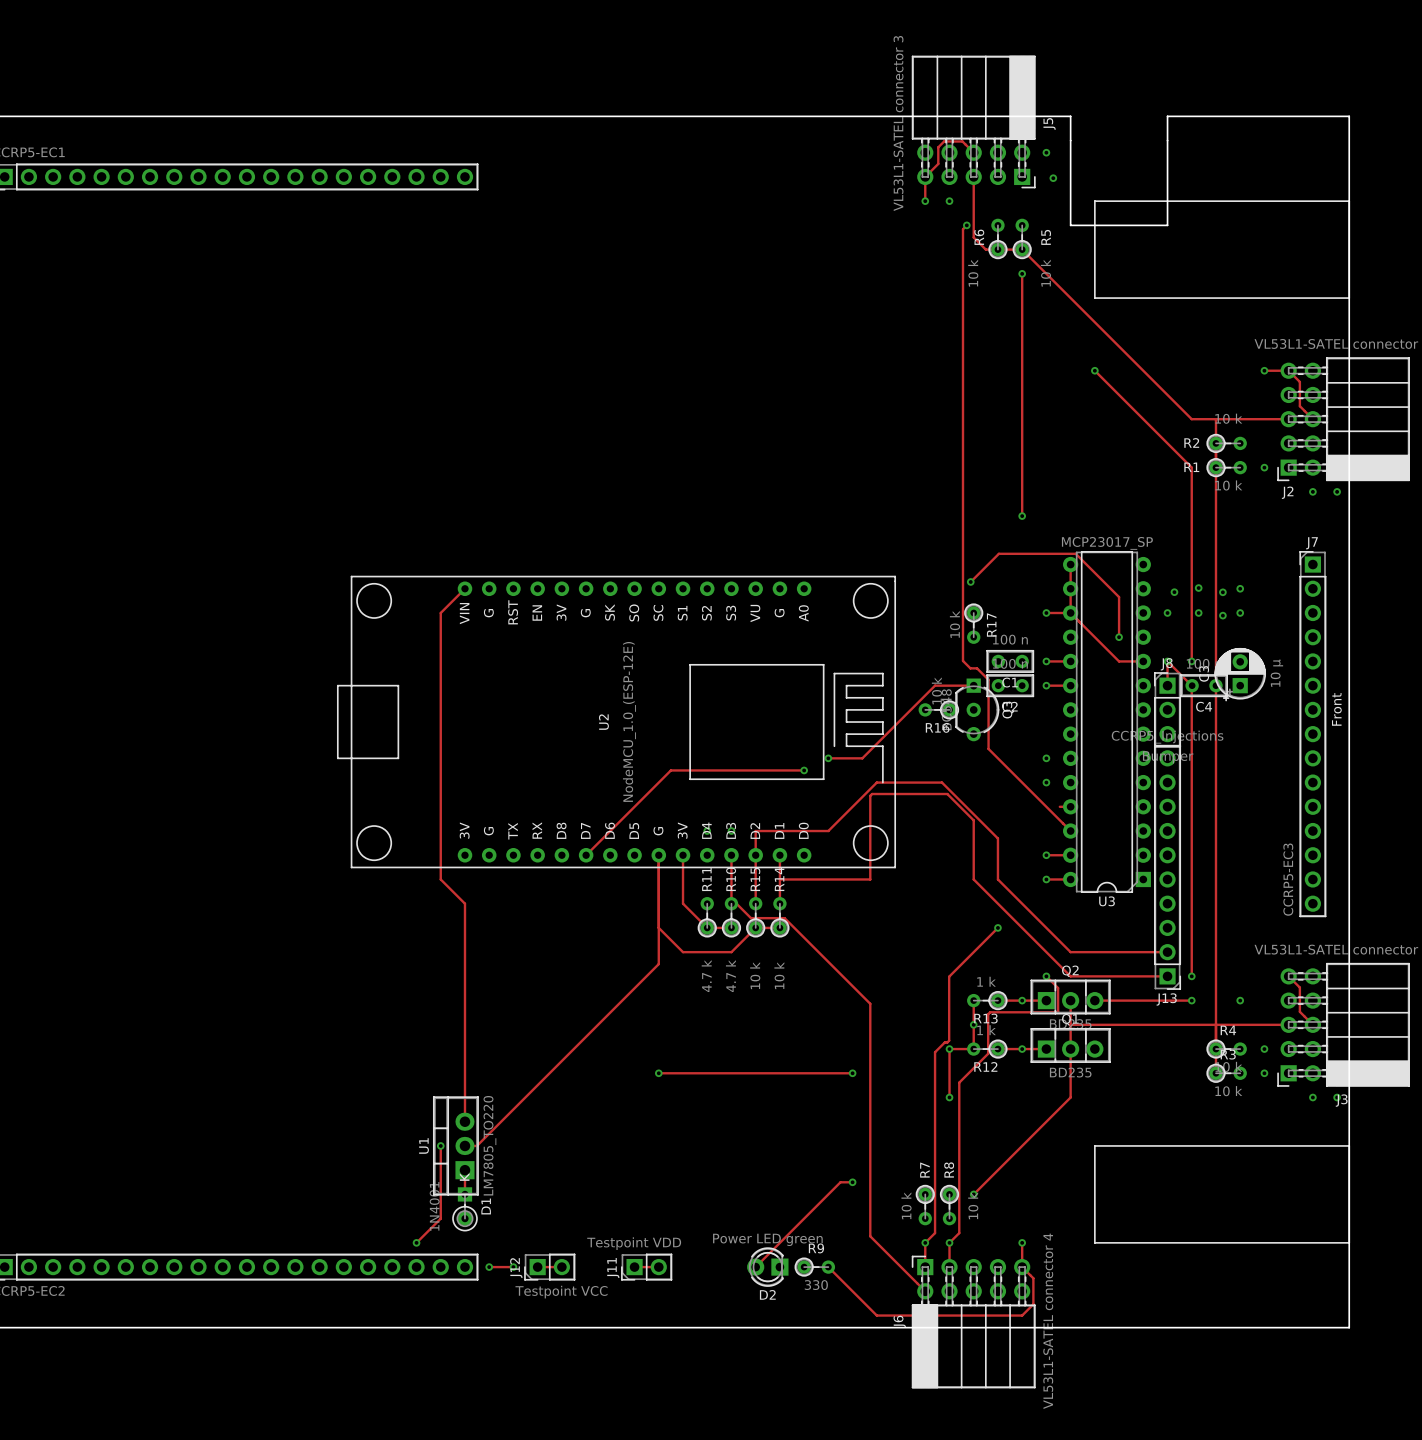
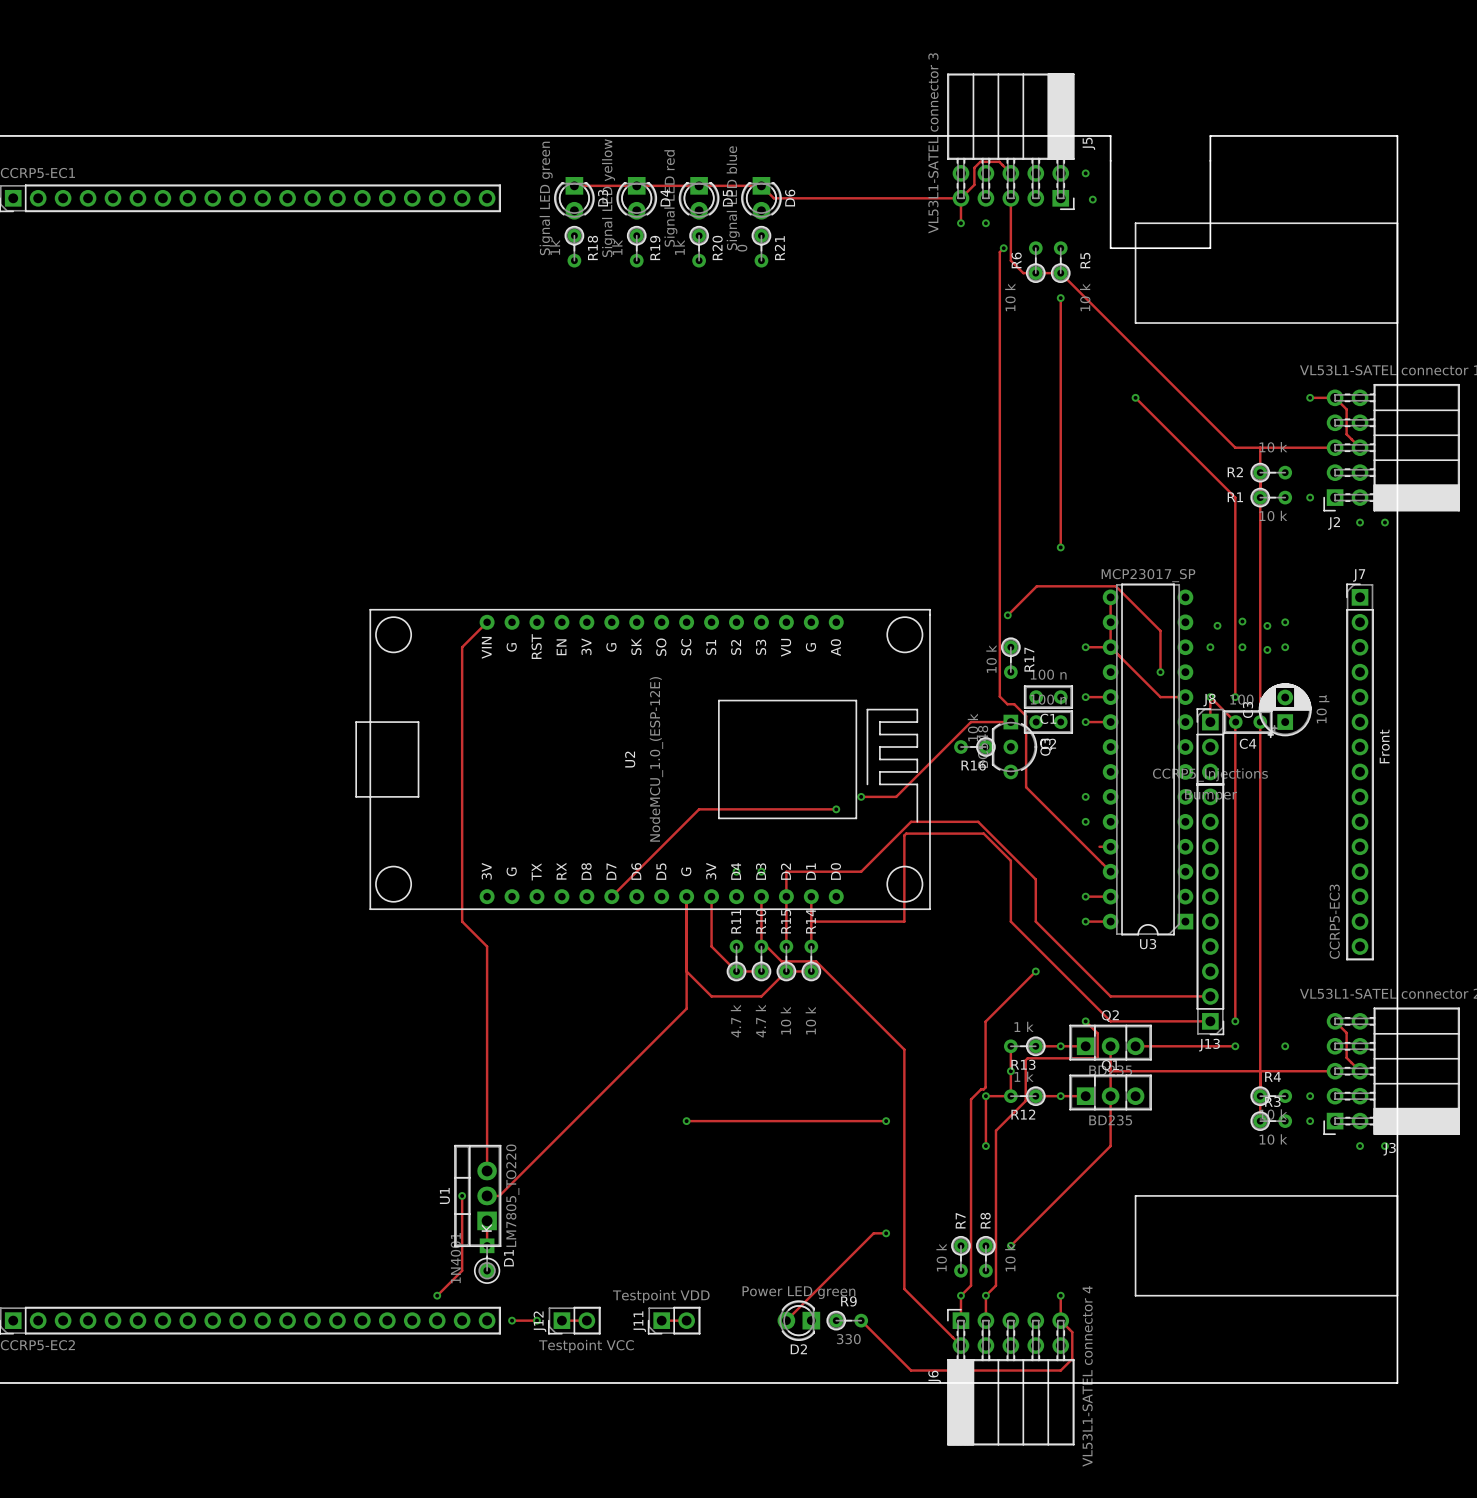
track: none -> (574, 185) (761, 185) (773, 198) (960, 198)
D3: none -> Signal LED green (574, 198)
D4: none -> Signal LED yellow (636, 198)
D5: none -> Signal LED red (699, 198)
D6: none -> Signal LED blue (761, 198)
R18: none -> 1k (574, 246)
R19: none -> 1k (636, 246)
R20: none -> 1k (699, 246)
R21: none -> 0 (761, 246)

